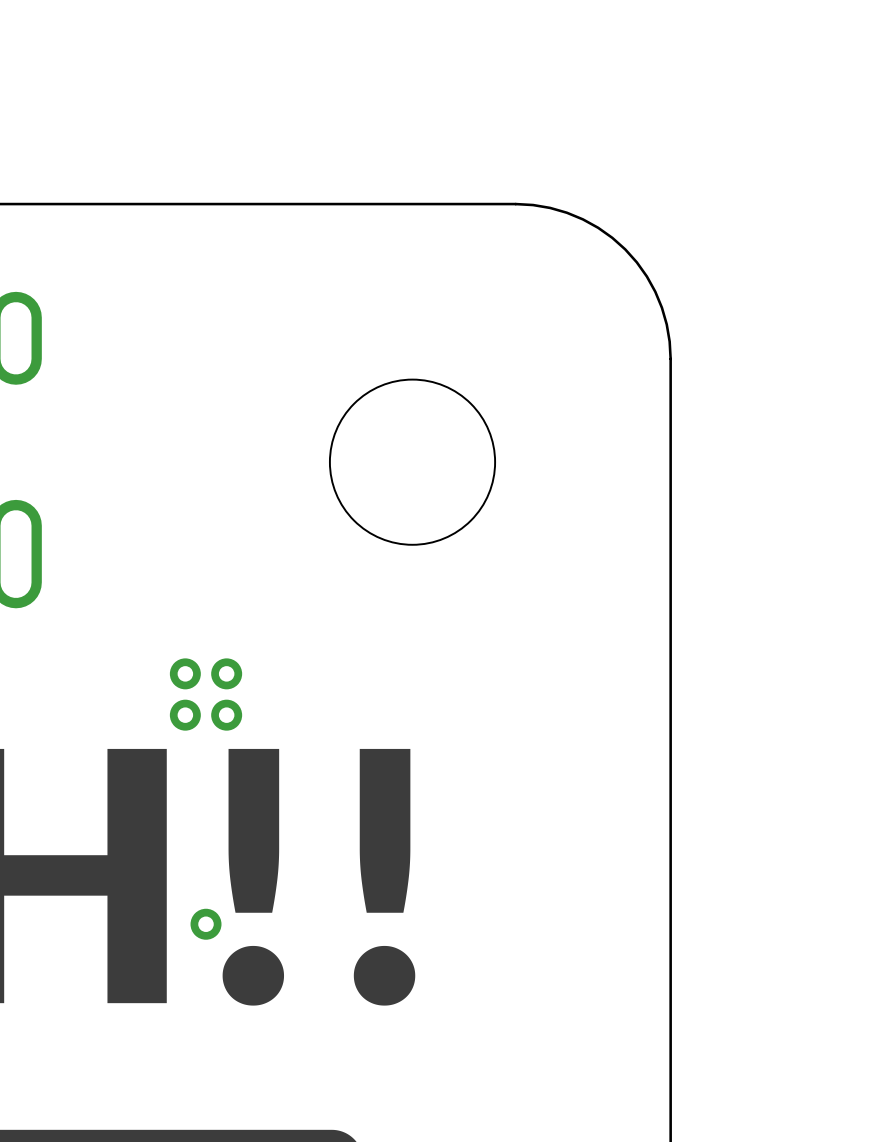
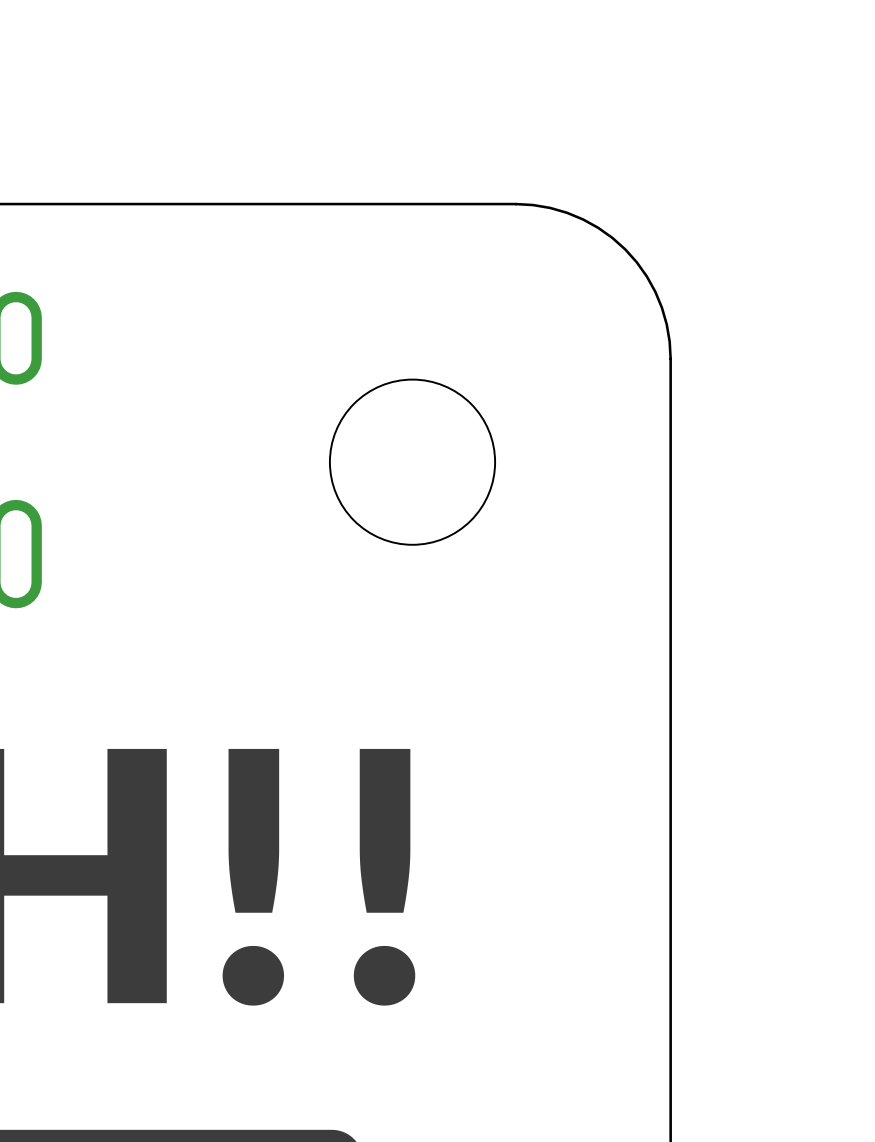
via: (185, 673) -> none
via: (226, 673) -> none
via: (185, 715) -> none
via: (226, 715) -> none
via: (206, 924) -> none

